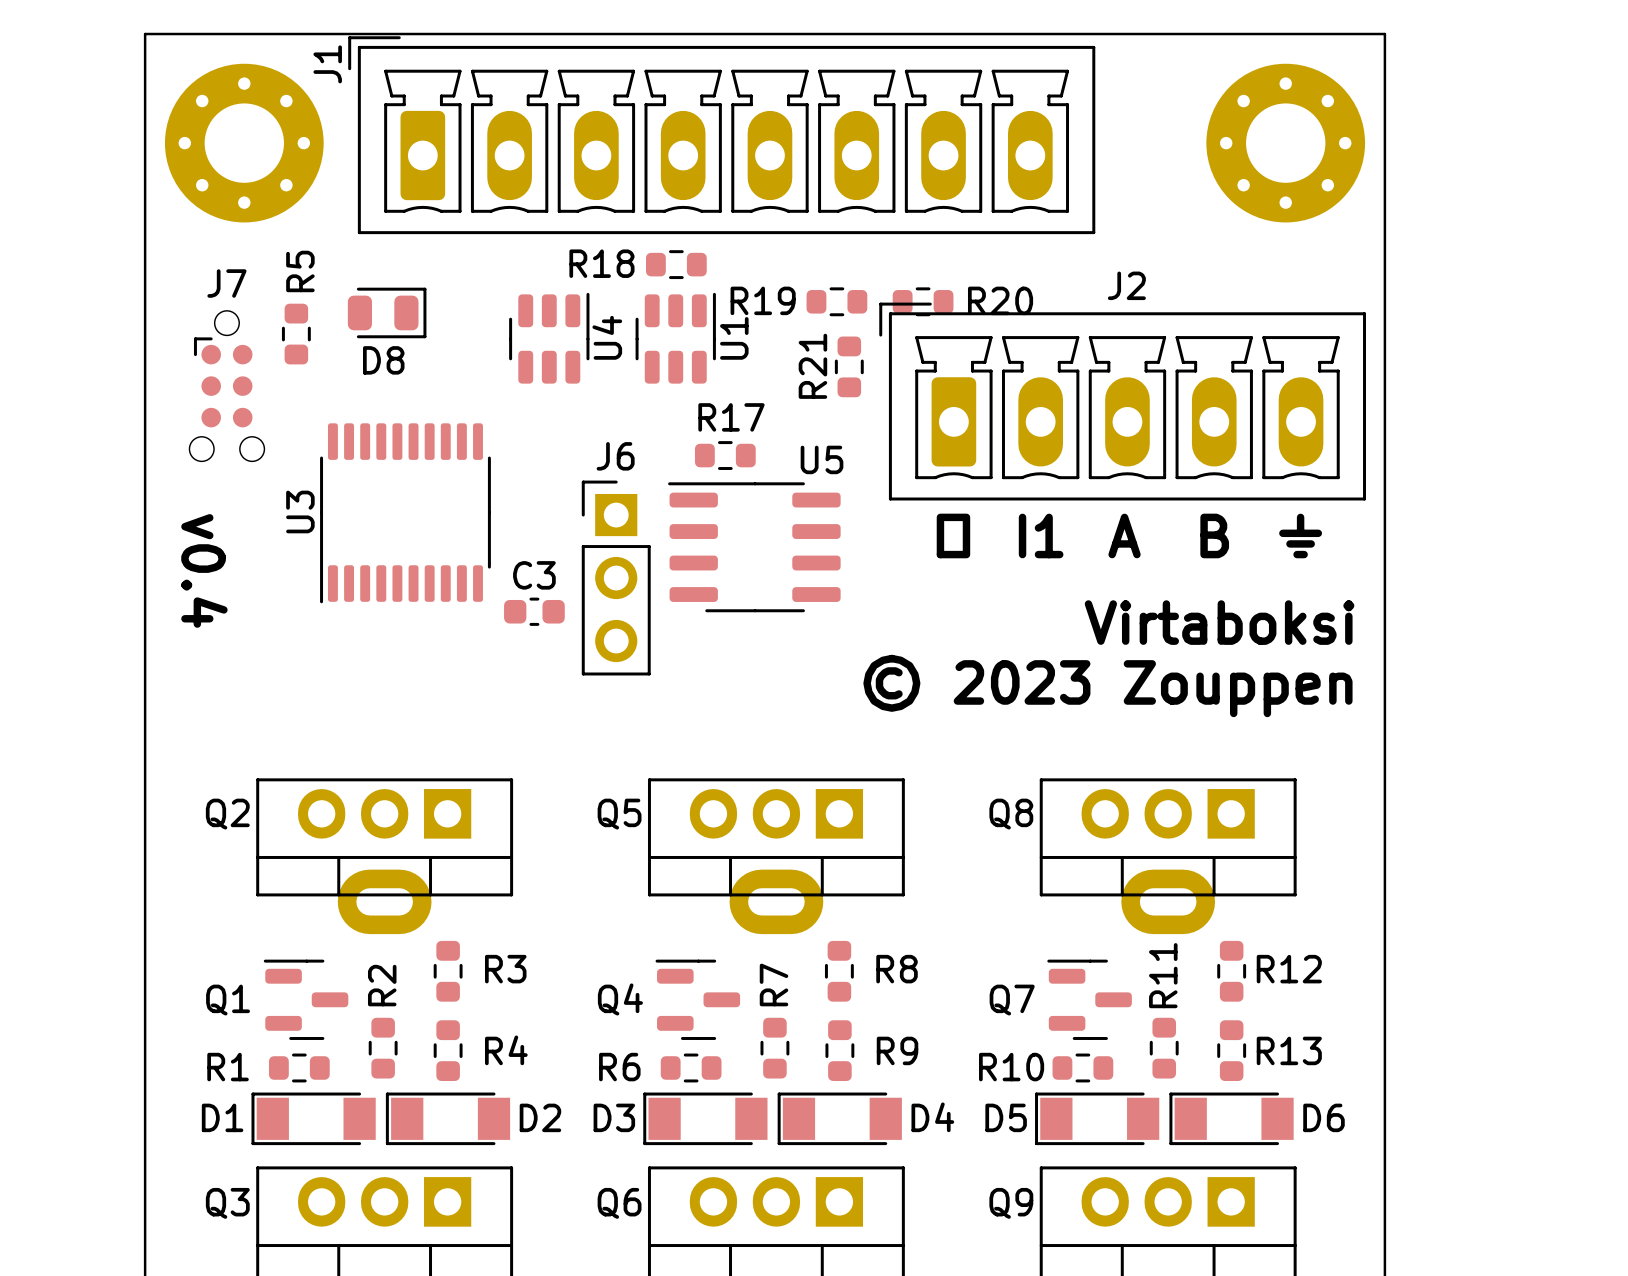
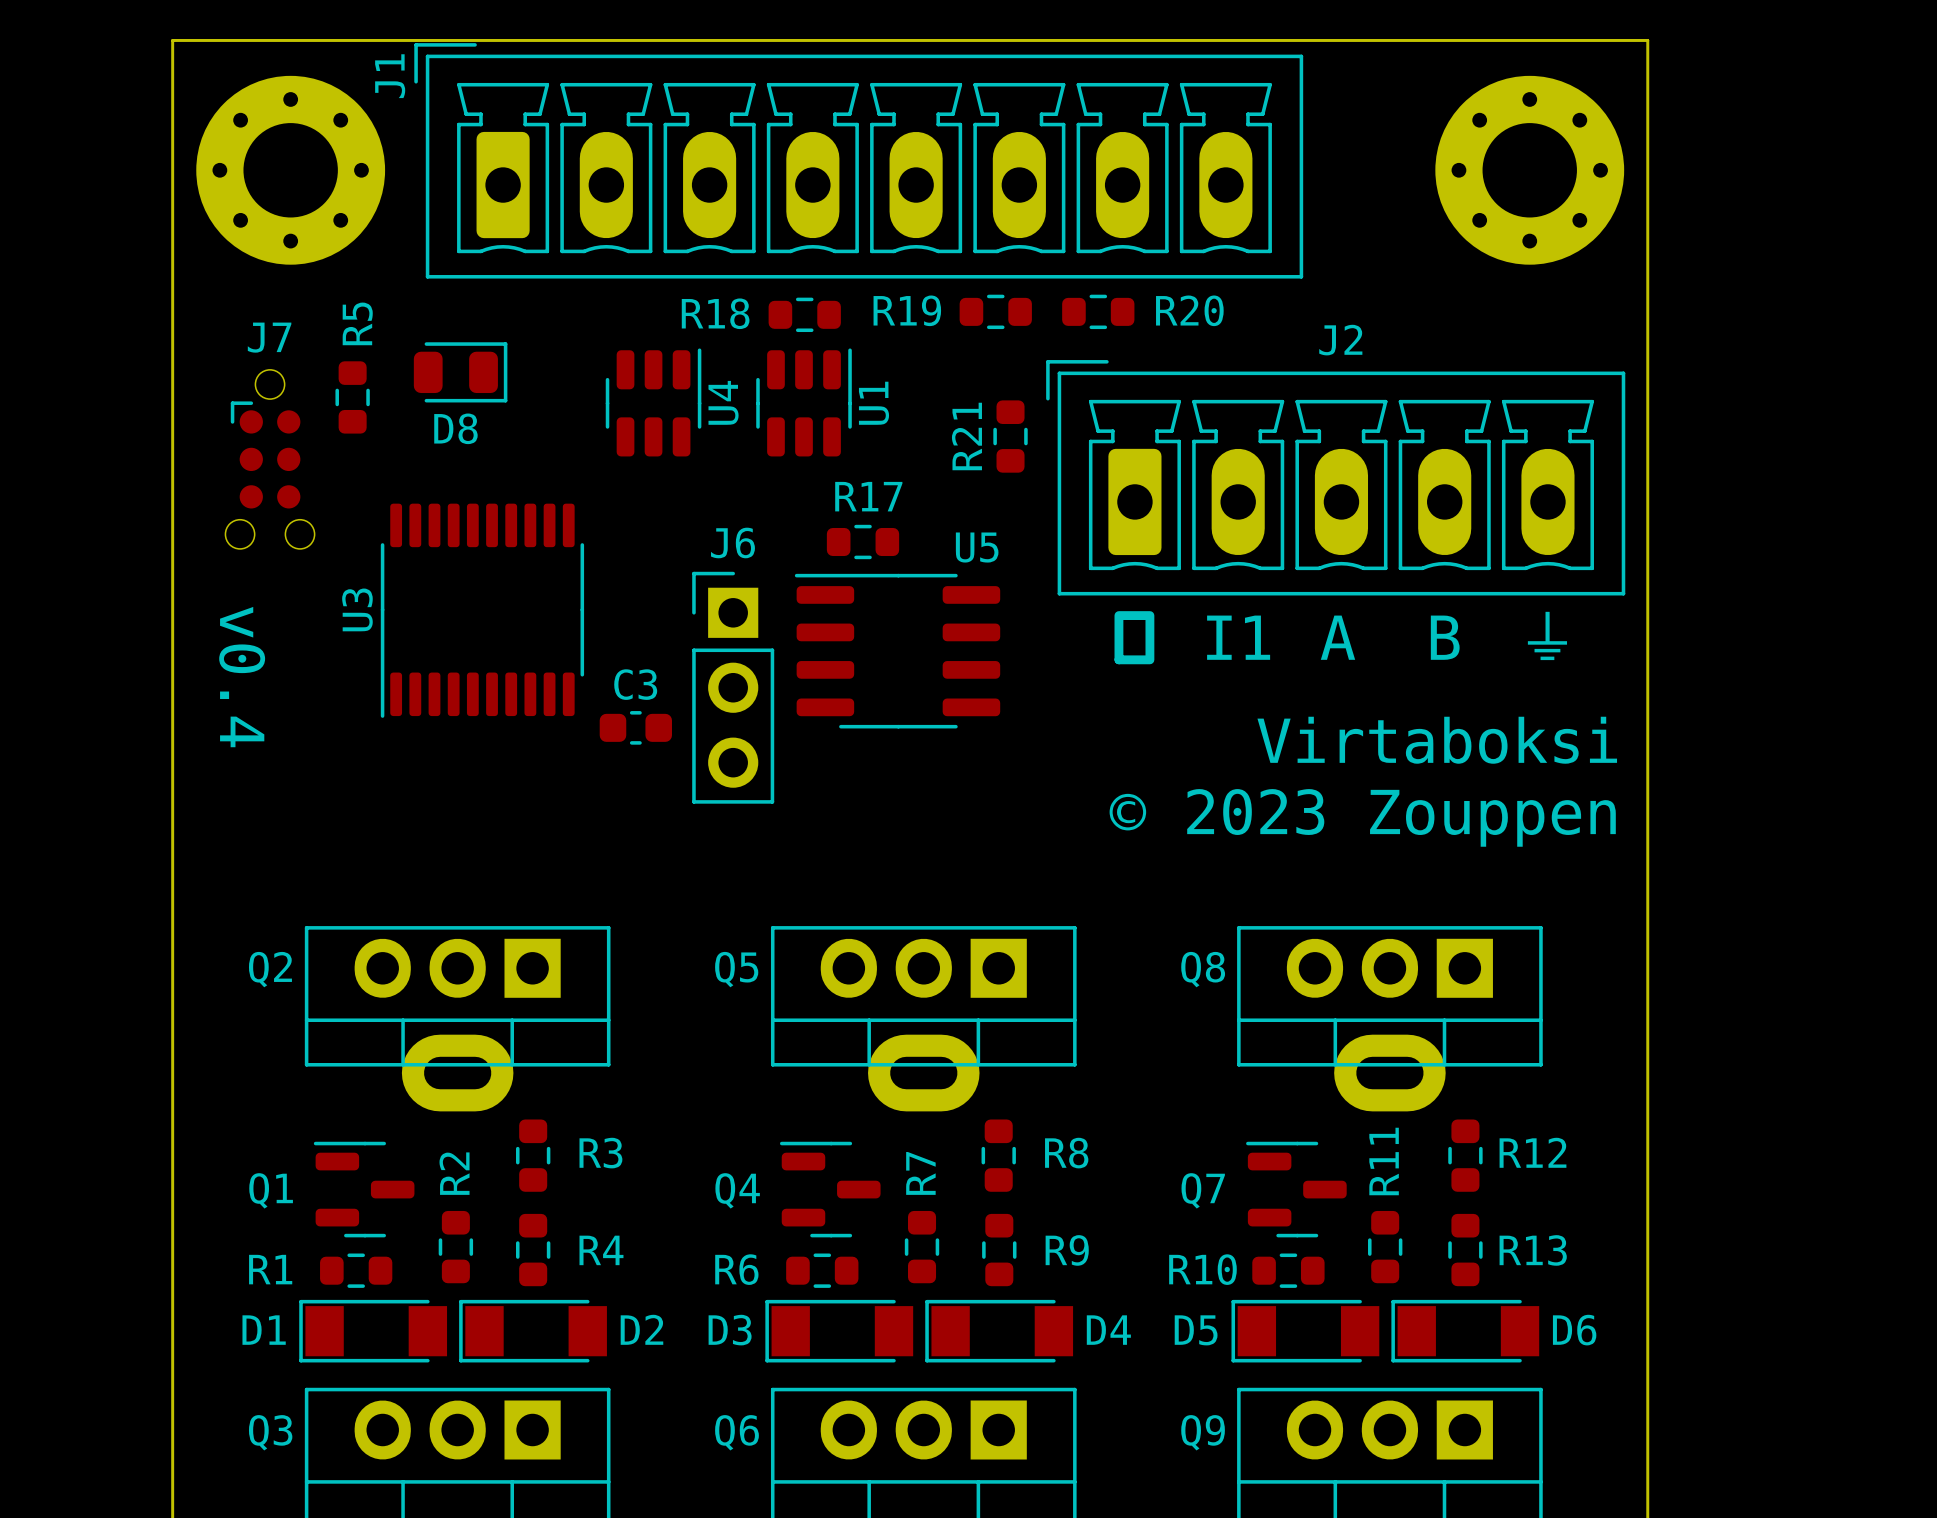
R19 position: (836, 301) -> (995, 311)
R20 position: (923, 301) -> (1098, 311)

